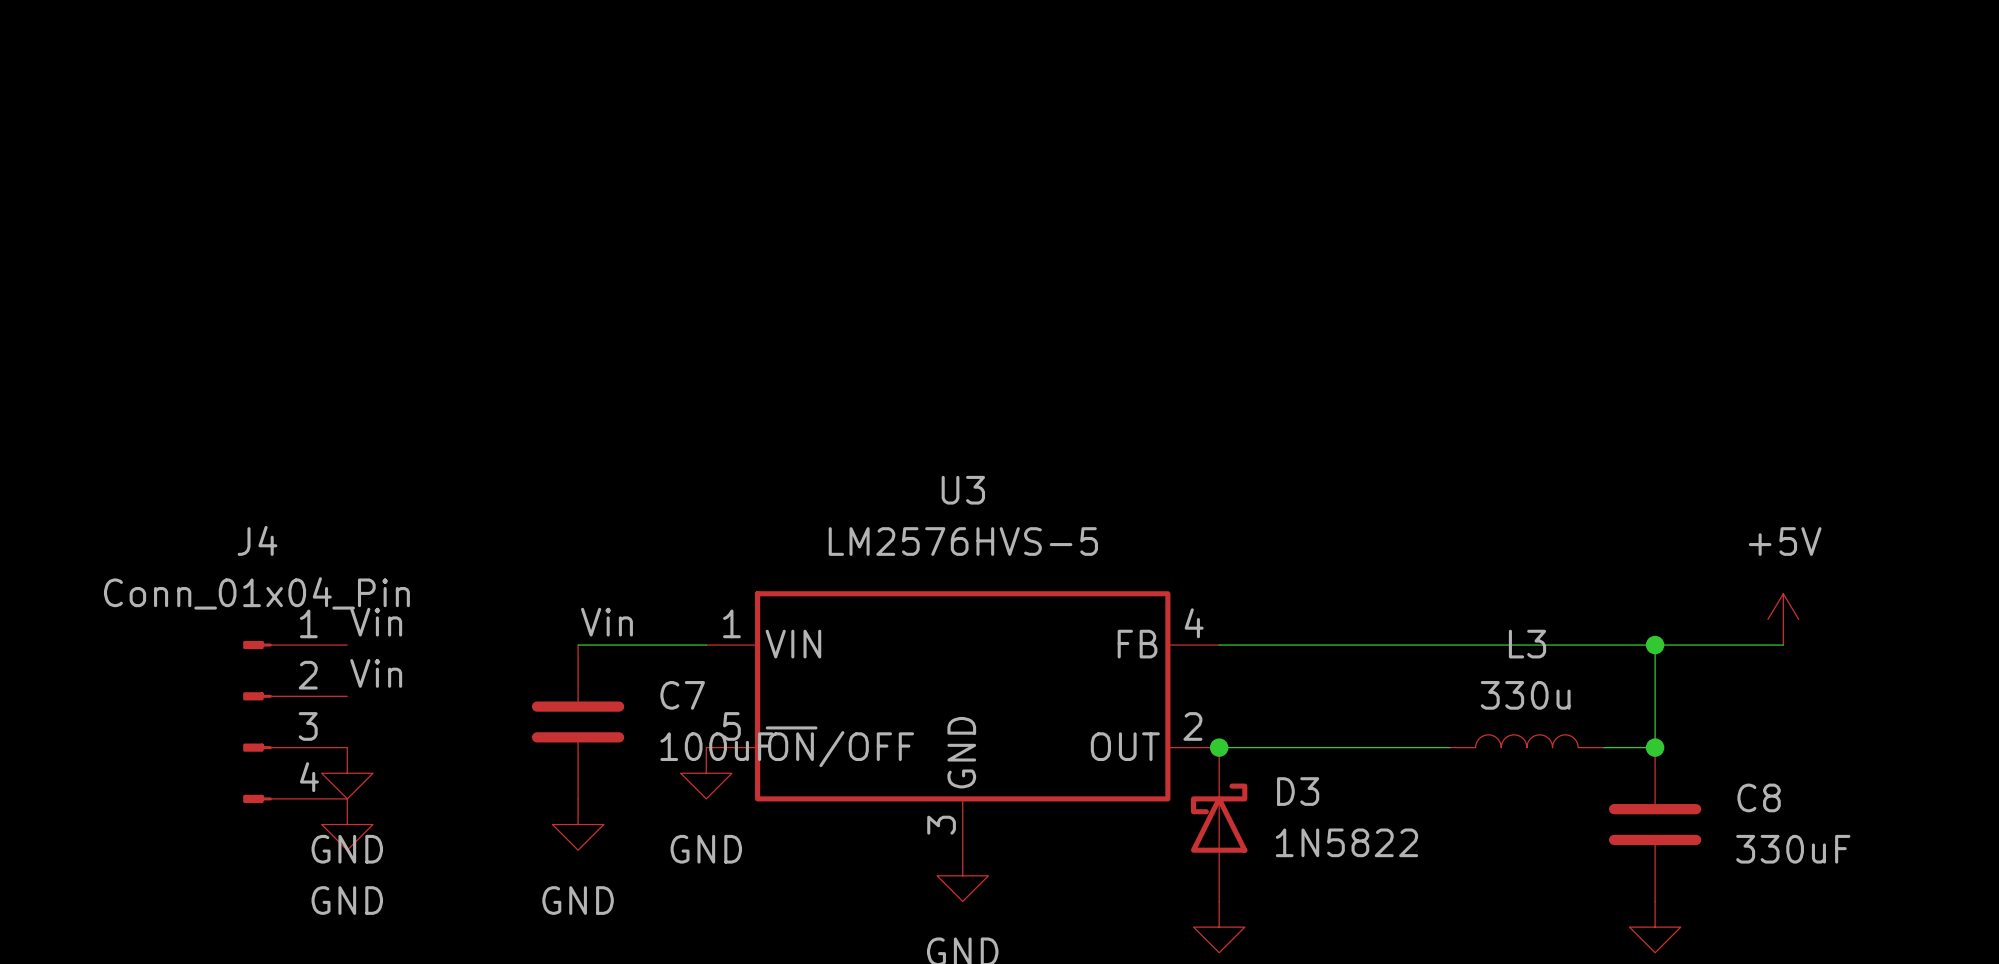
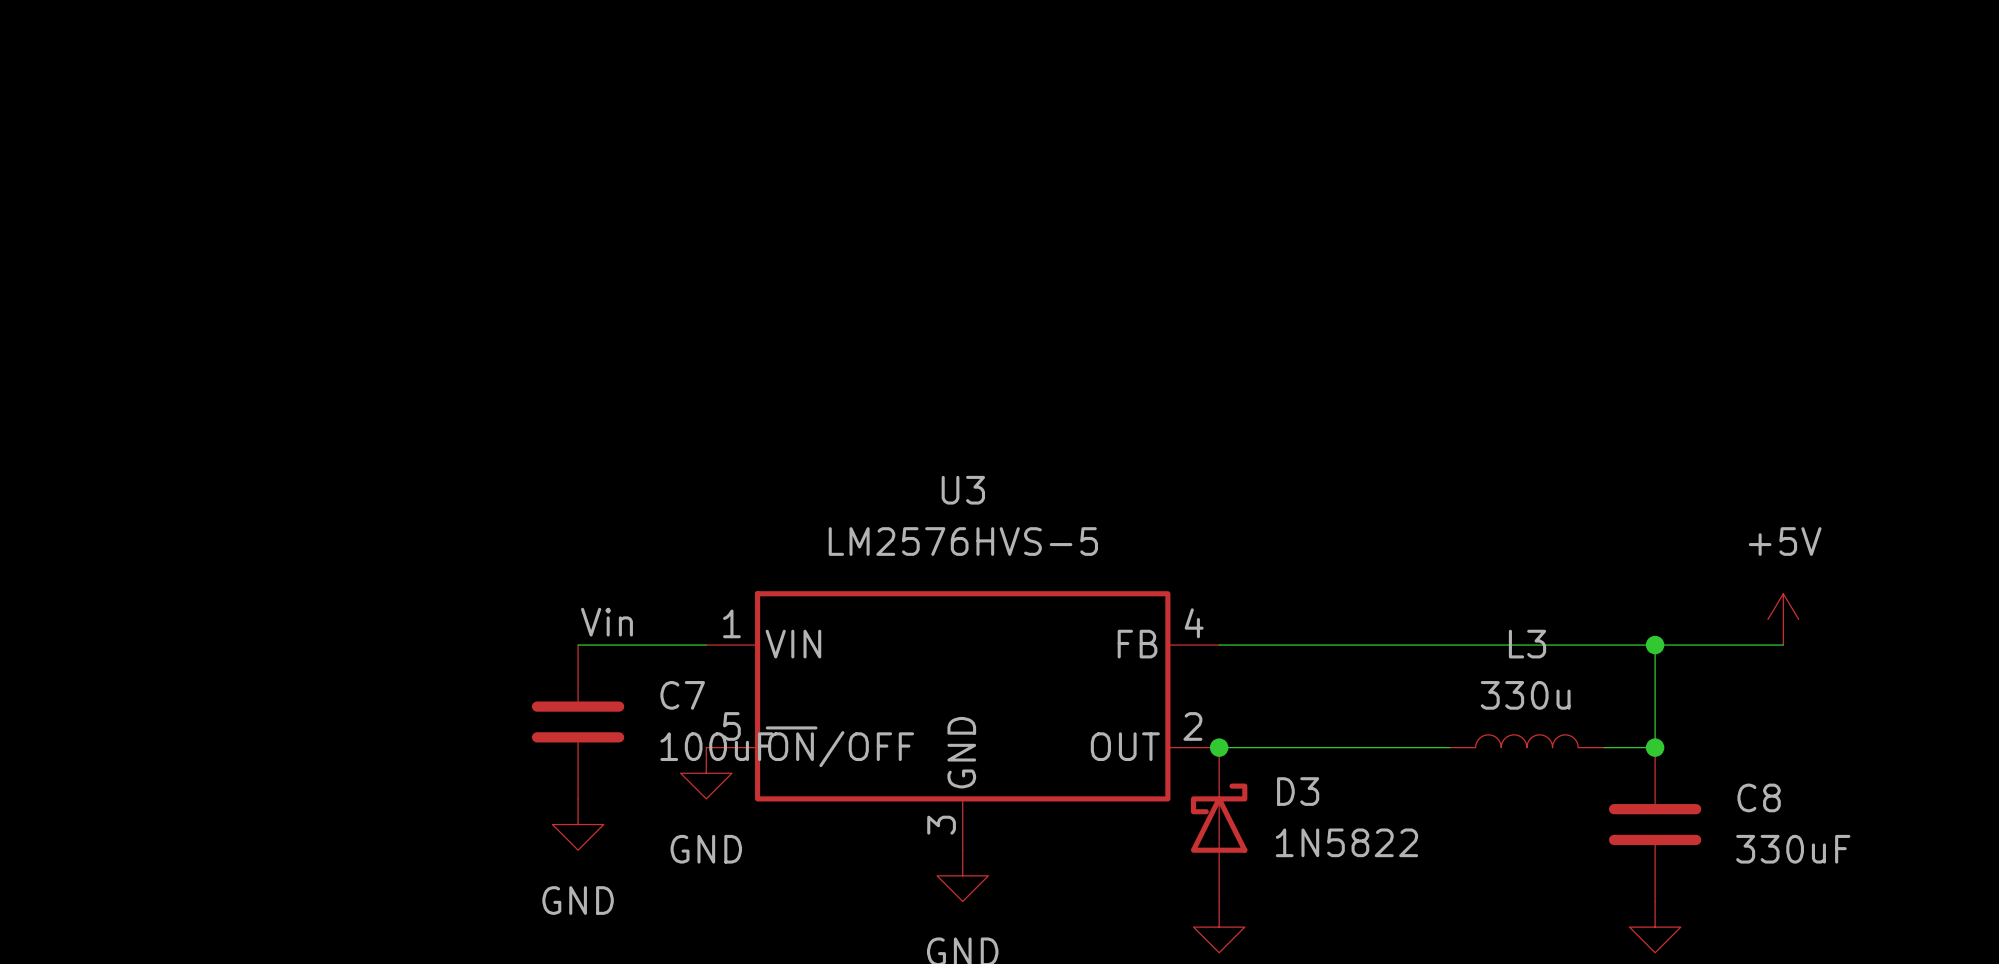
label: Vin (376, 622) -> none
label: Vin (376, 673) -> none
J4: Conn_01x04_Pin (295, 721) -> none
power symbol: GND (347, 773) -> none
power symbol: GND (347, 824) -> none

